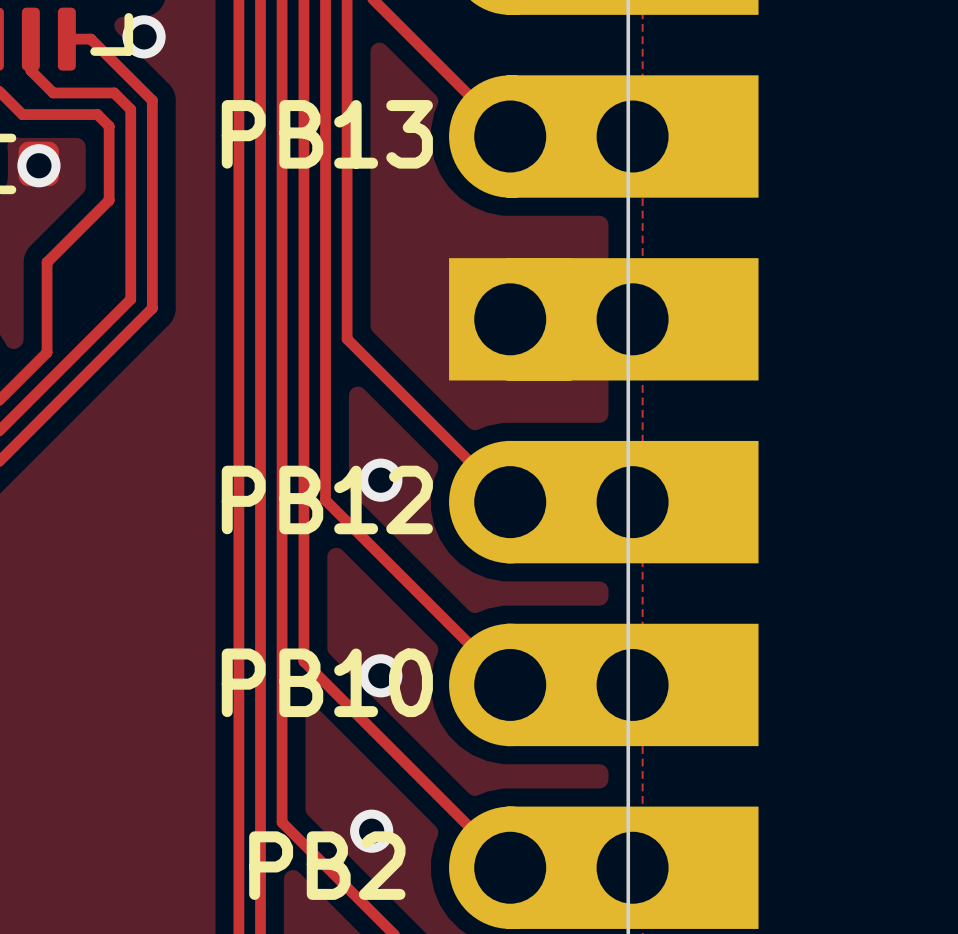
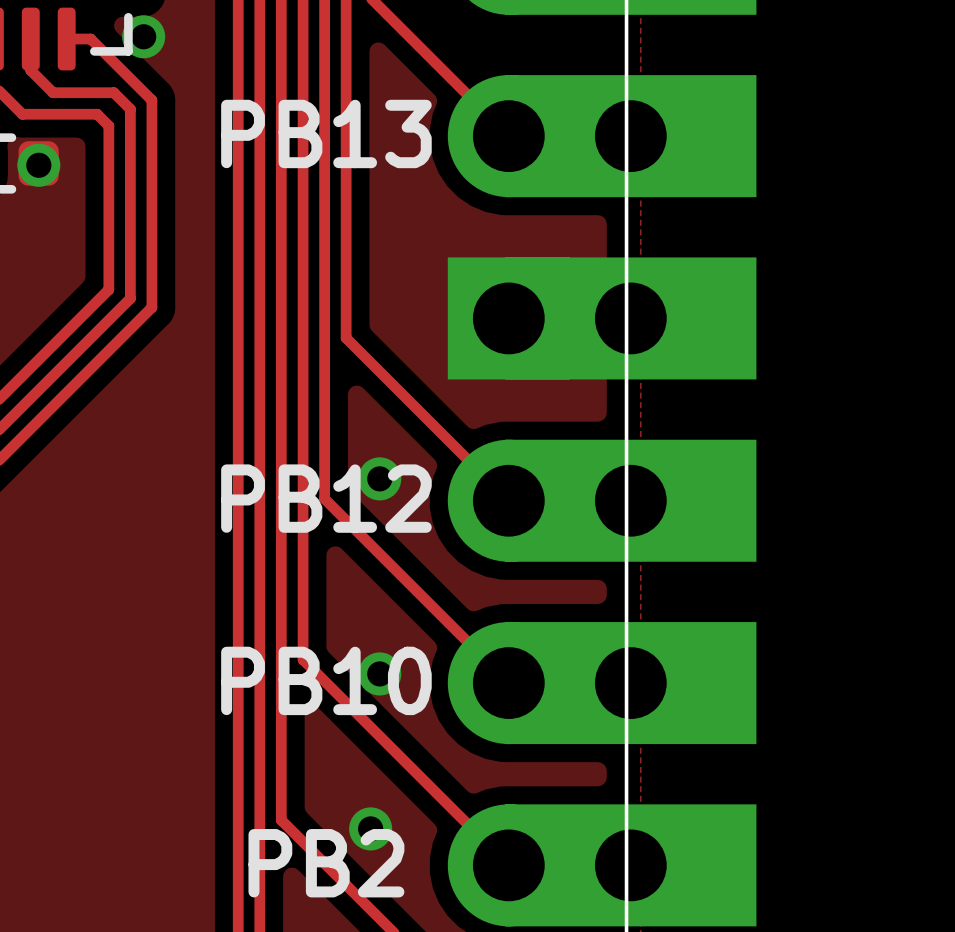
track: (109, 200) (47, 262) (47, 352) -> (108, 199) (108, 289) (46, 351)

